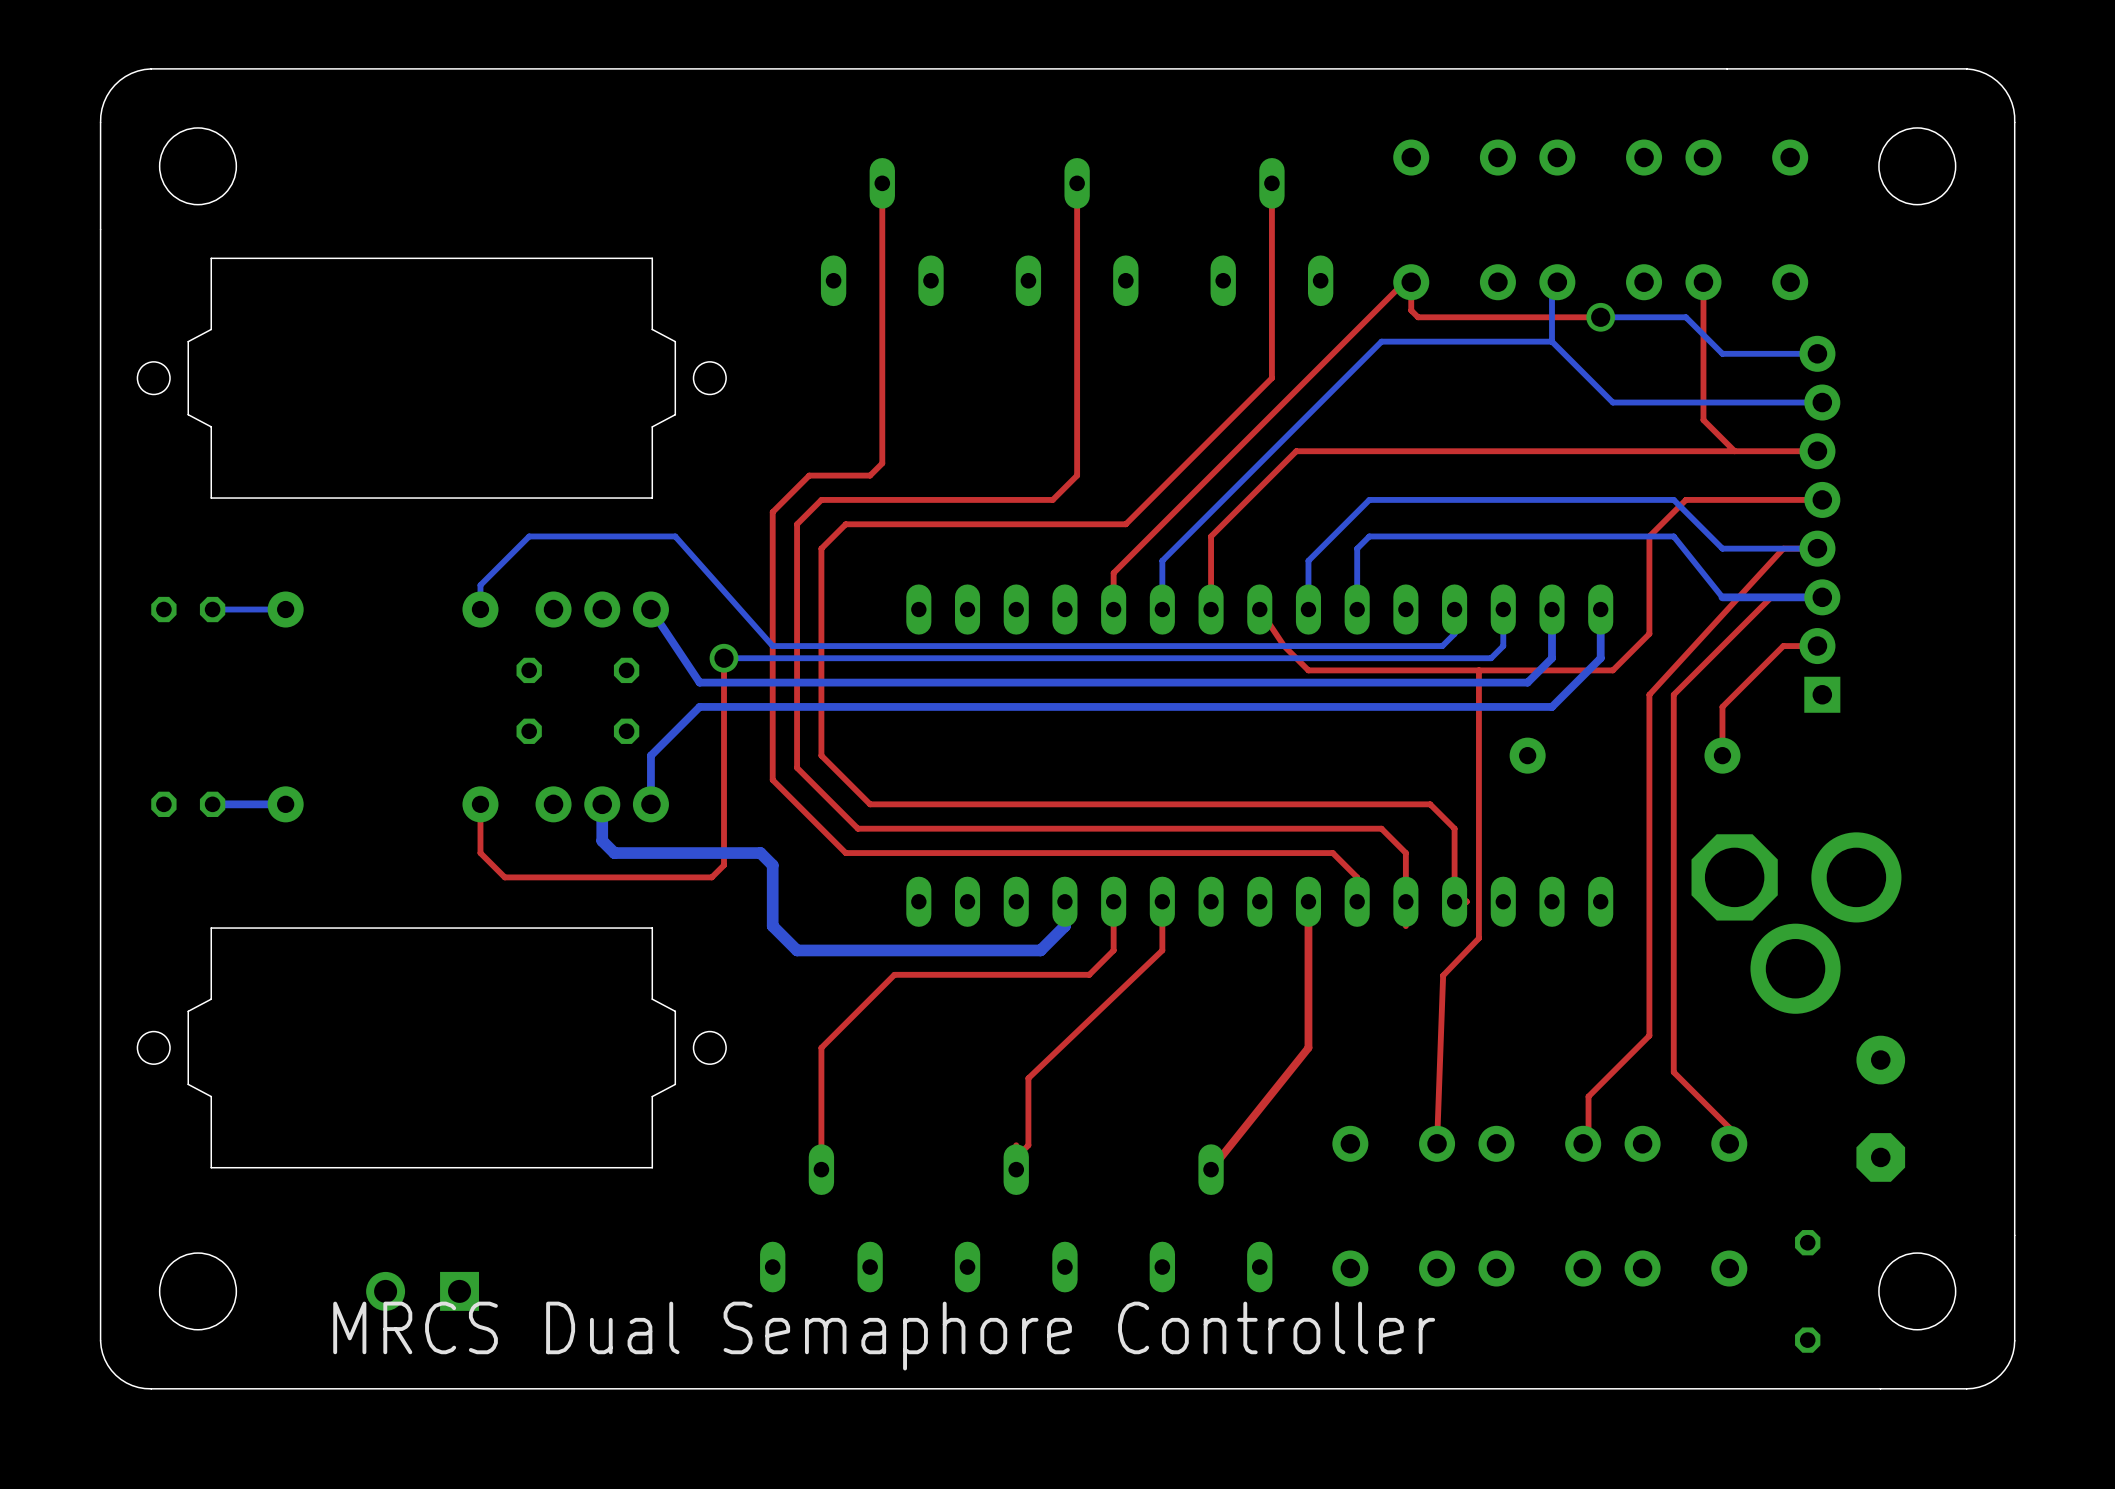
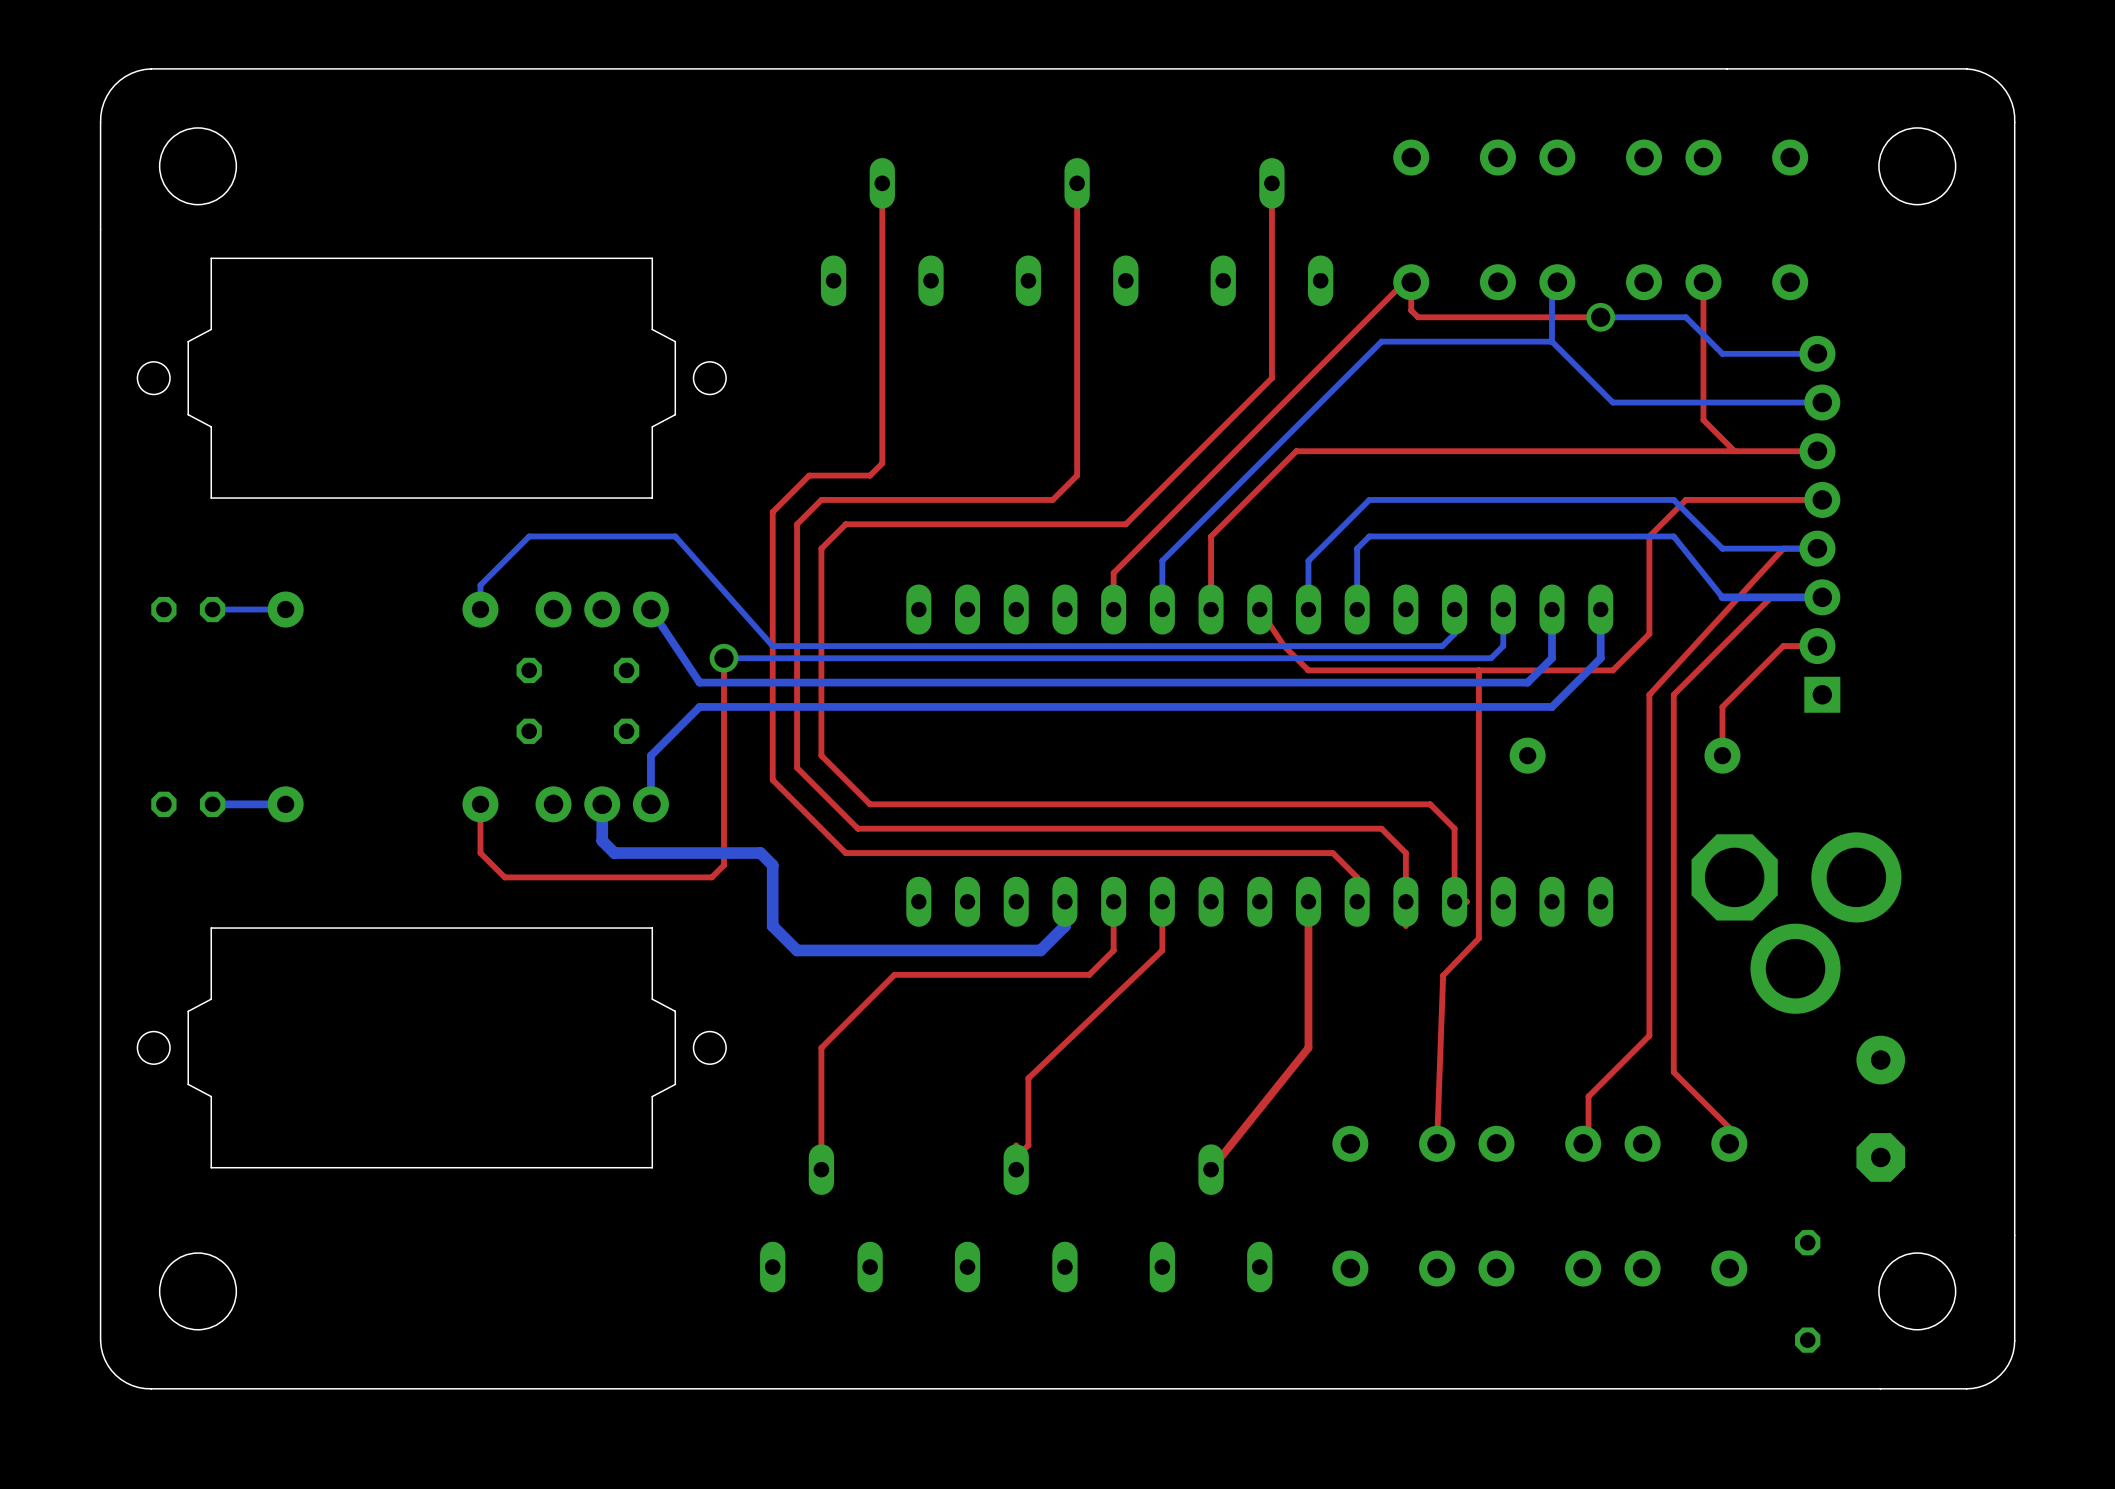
part: (422, 1291) -> none
text: MRCS Dual Semaphore Controller (884, 1336) -> none

